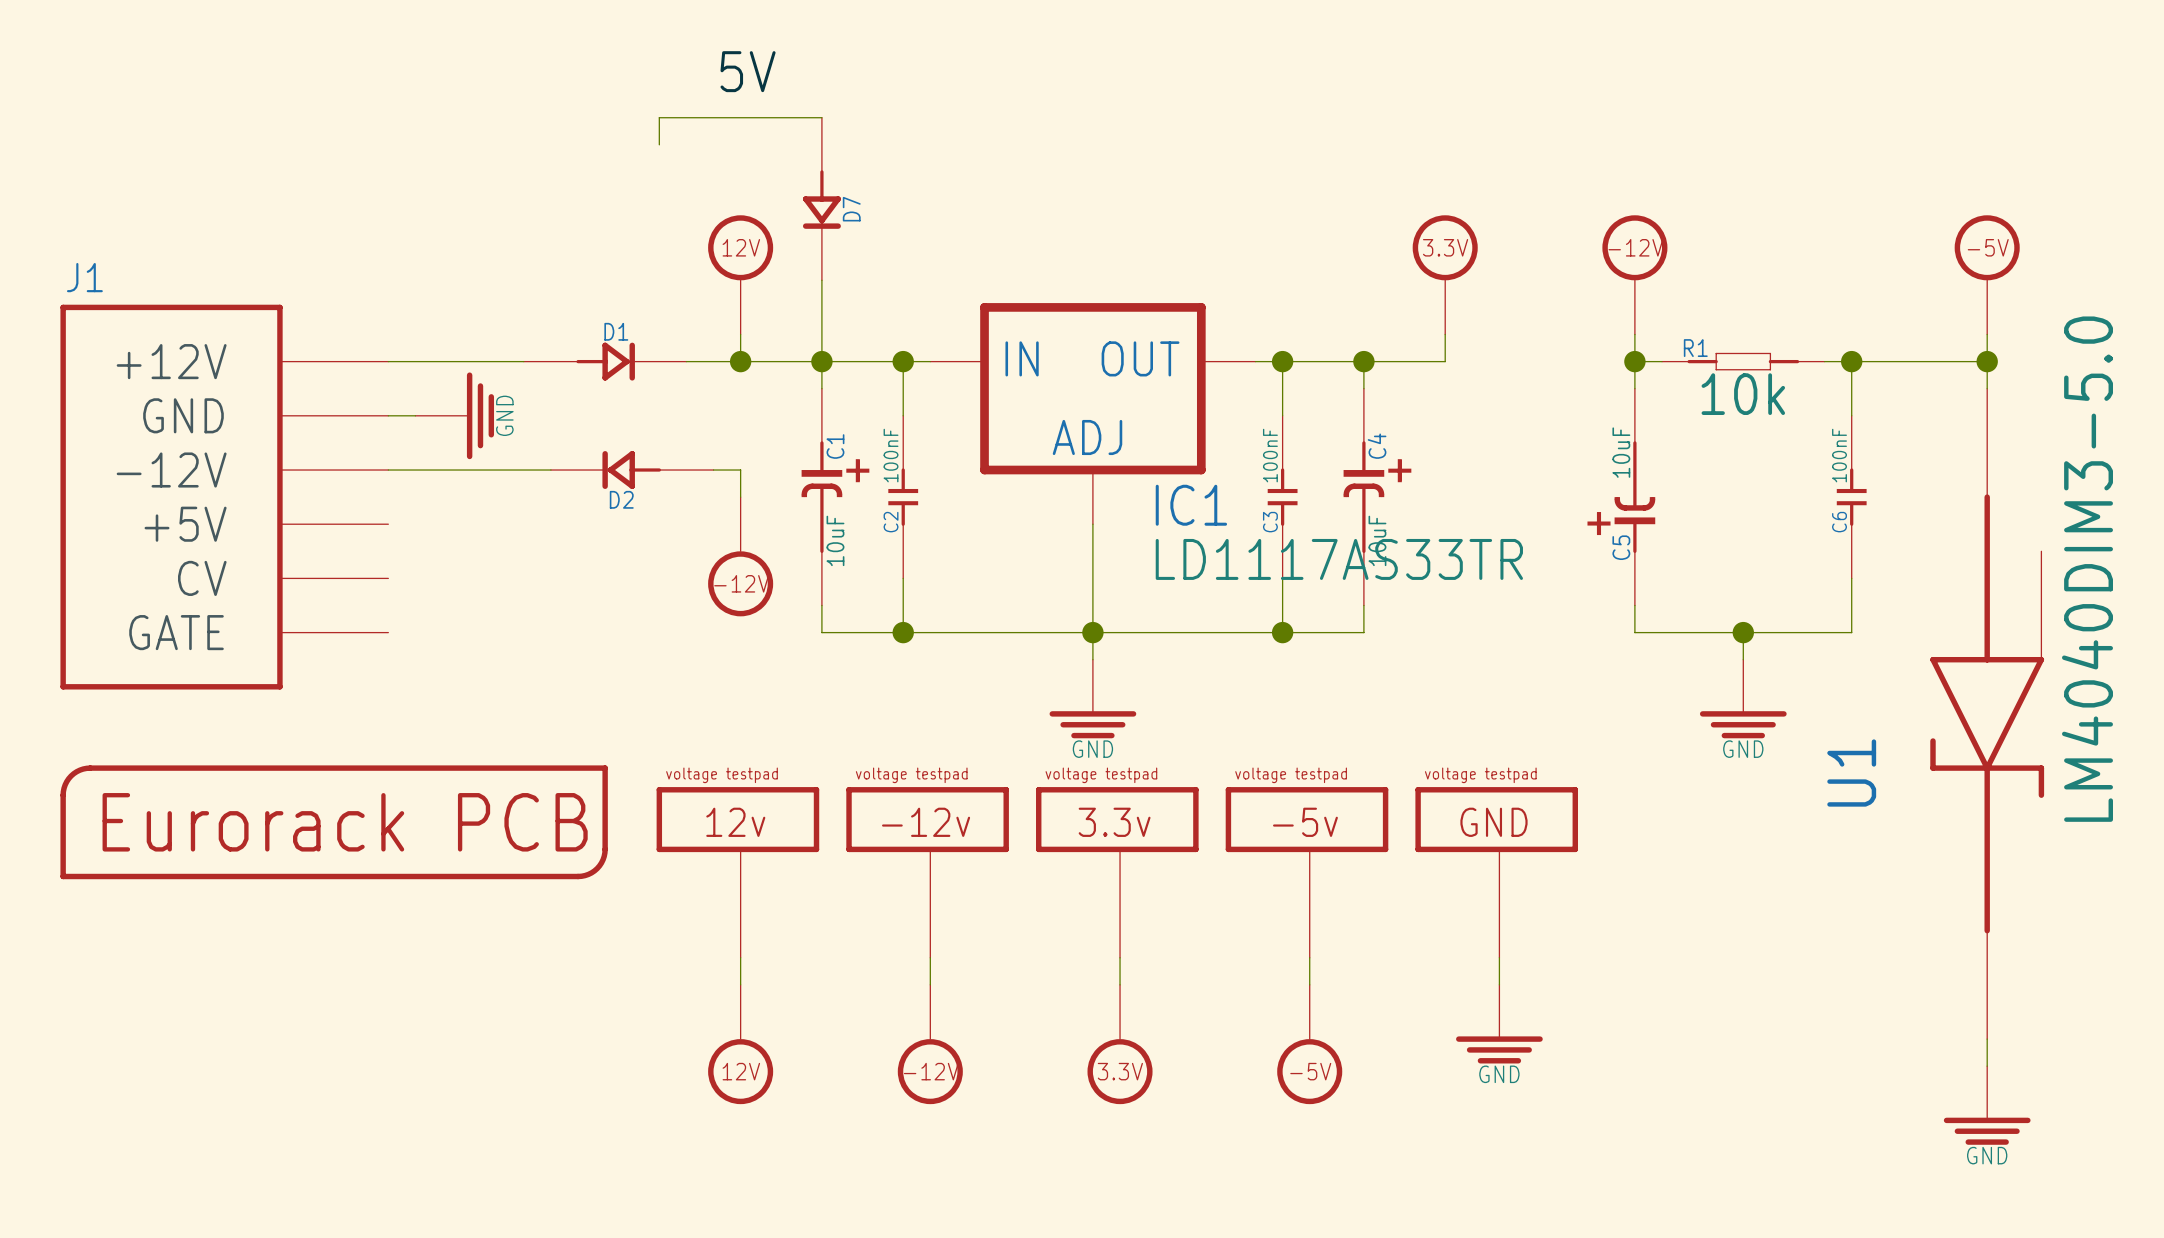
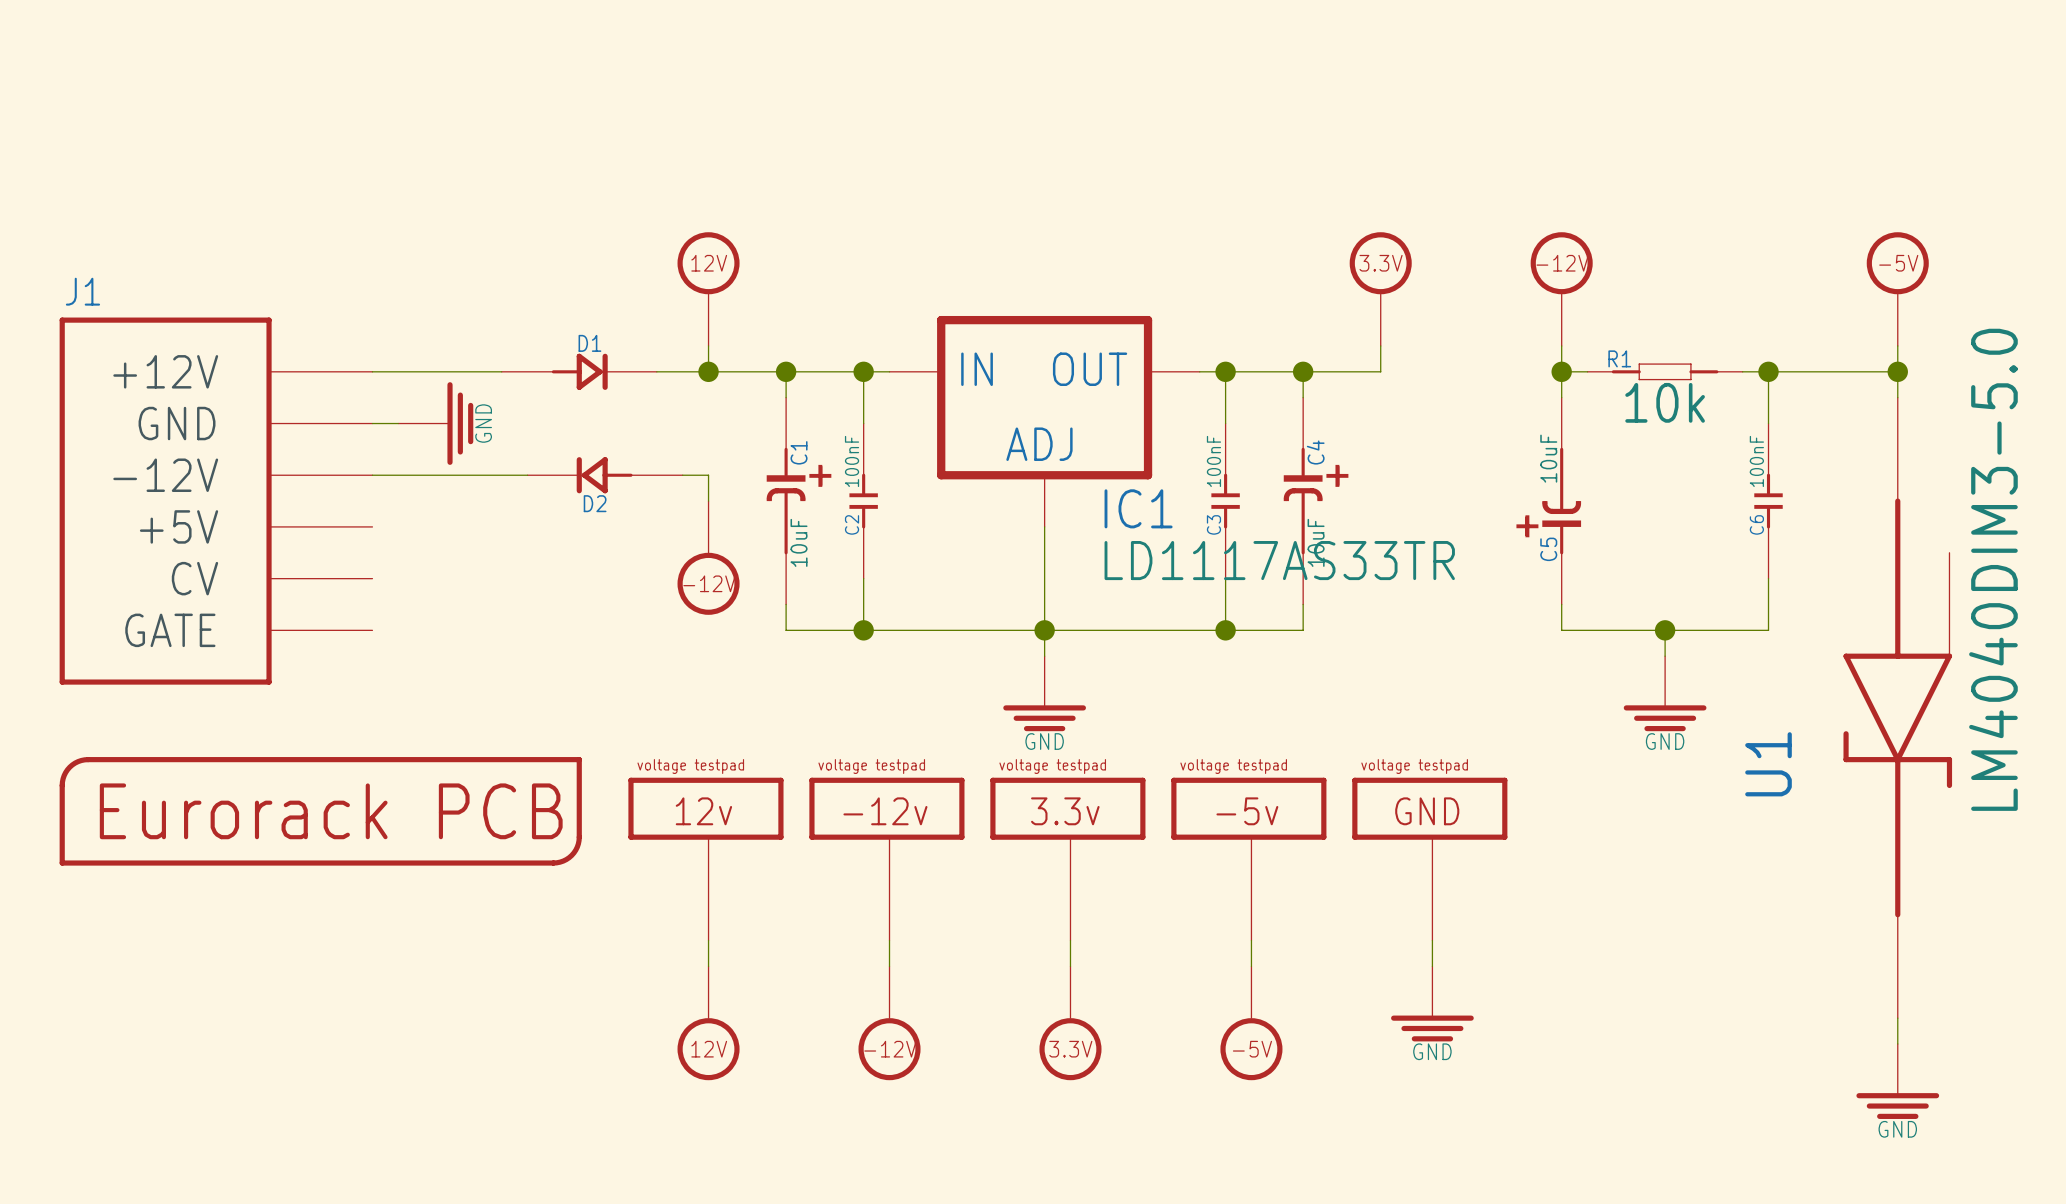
label: 5V (748, 71) -> none
wire: (821, 117) (659, 117) (659, 144) -> none
D7: (821, 199) -> none
wire: (821, 280) (821, 361) -> none

